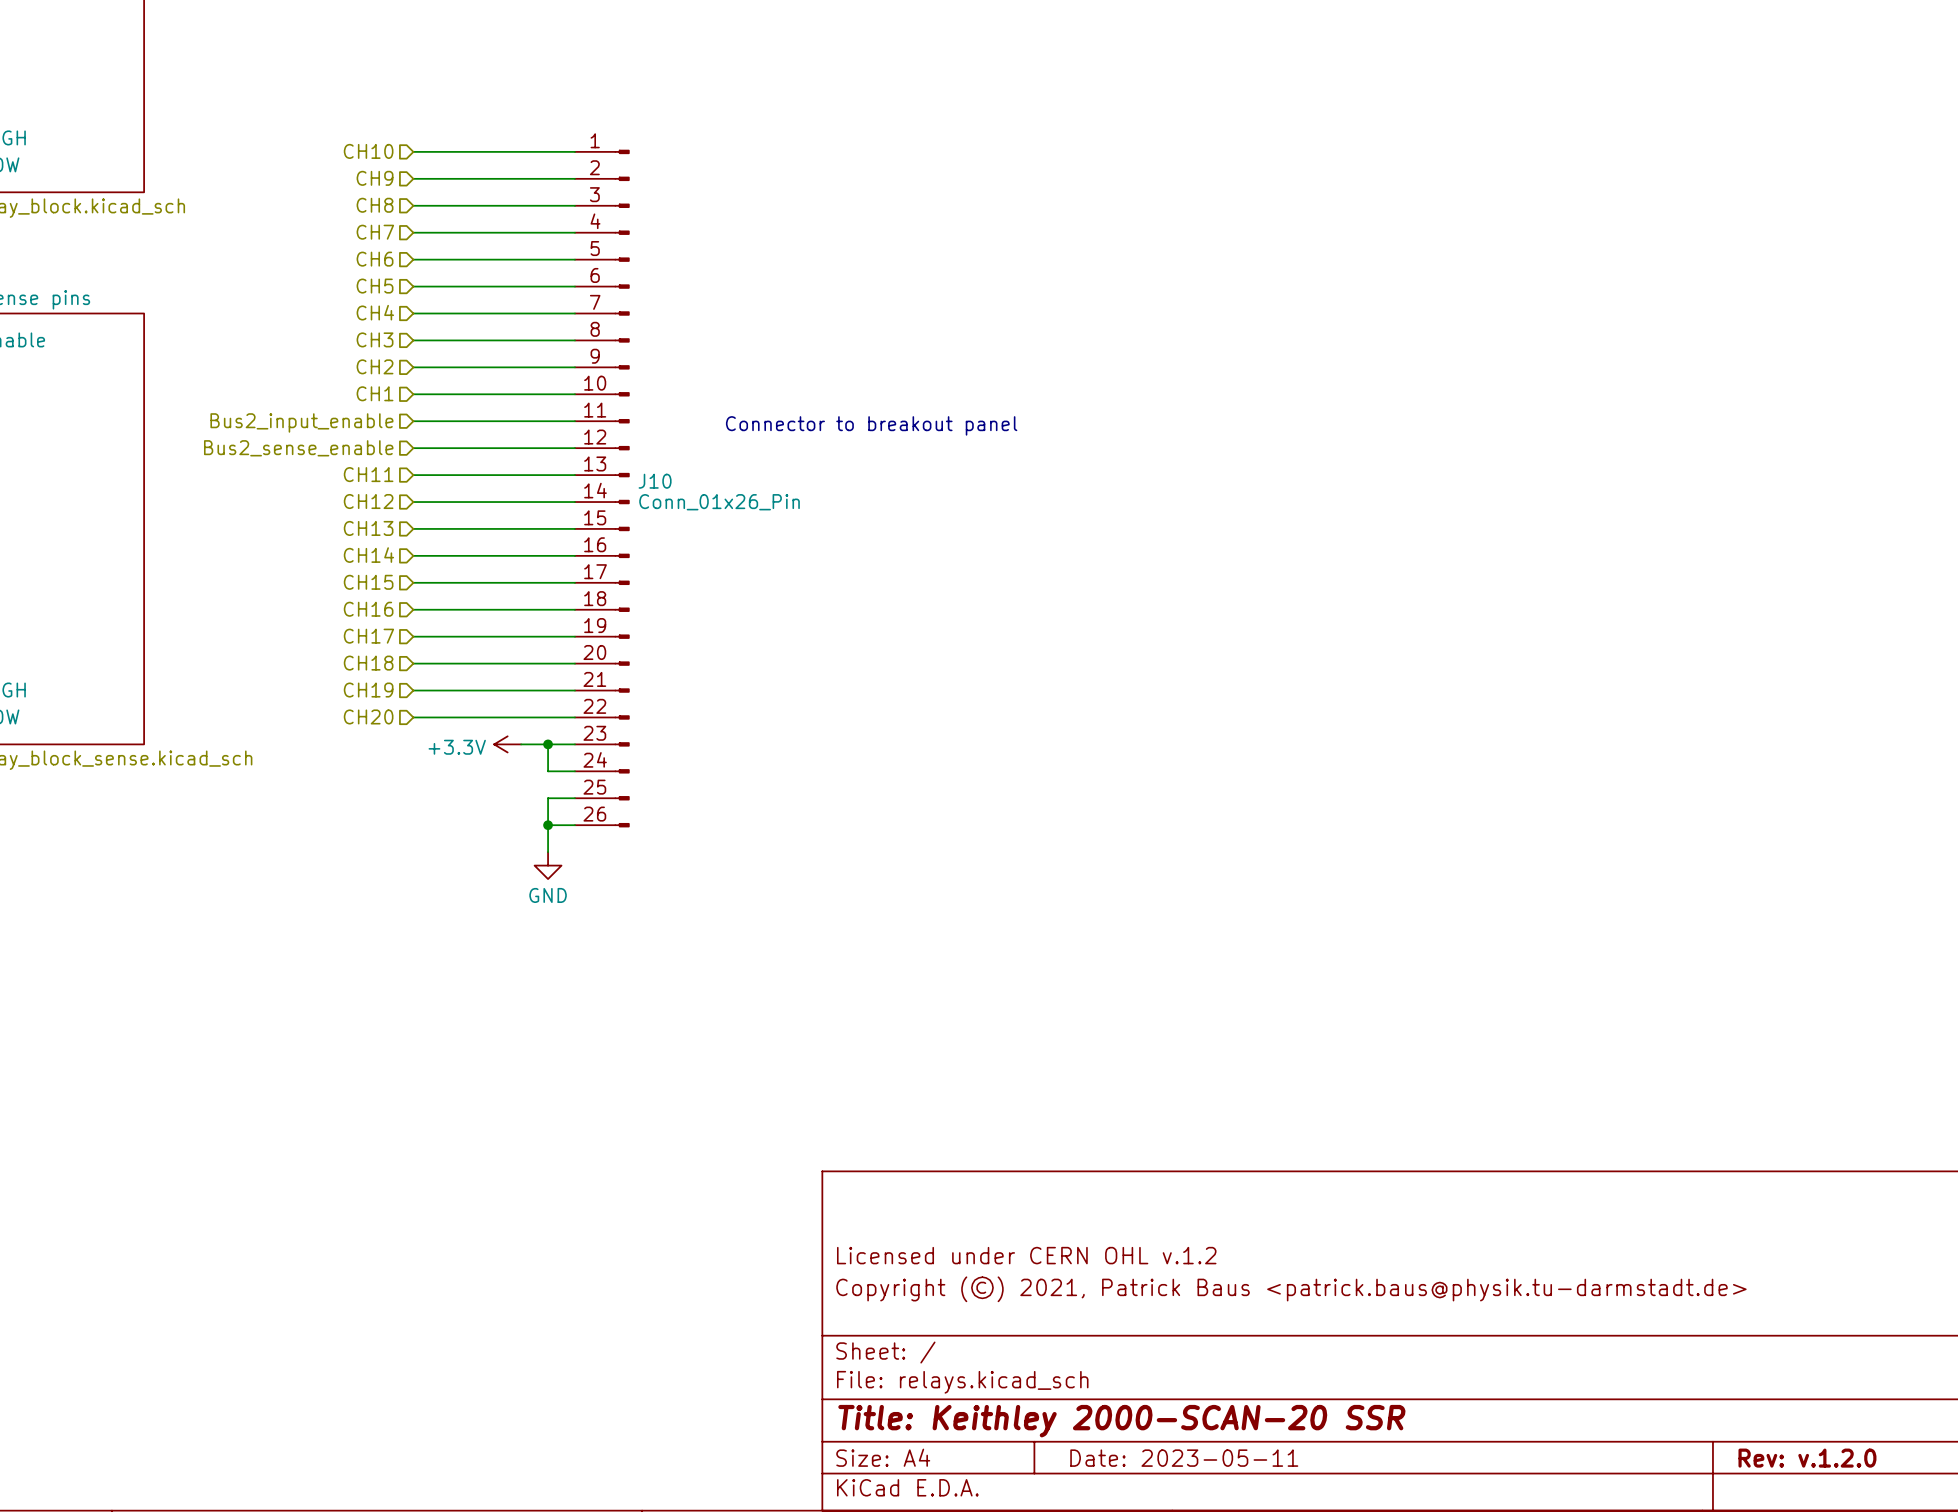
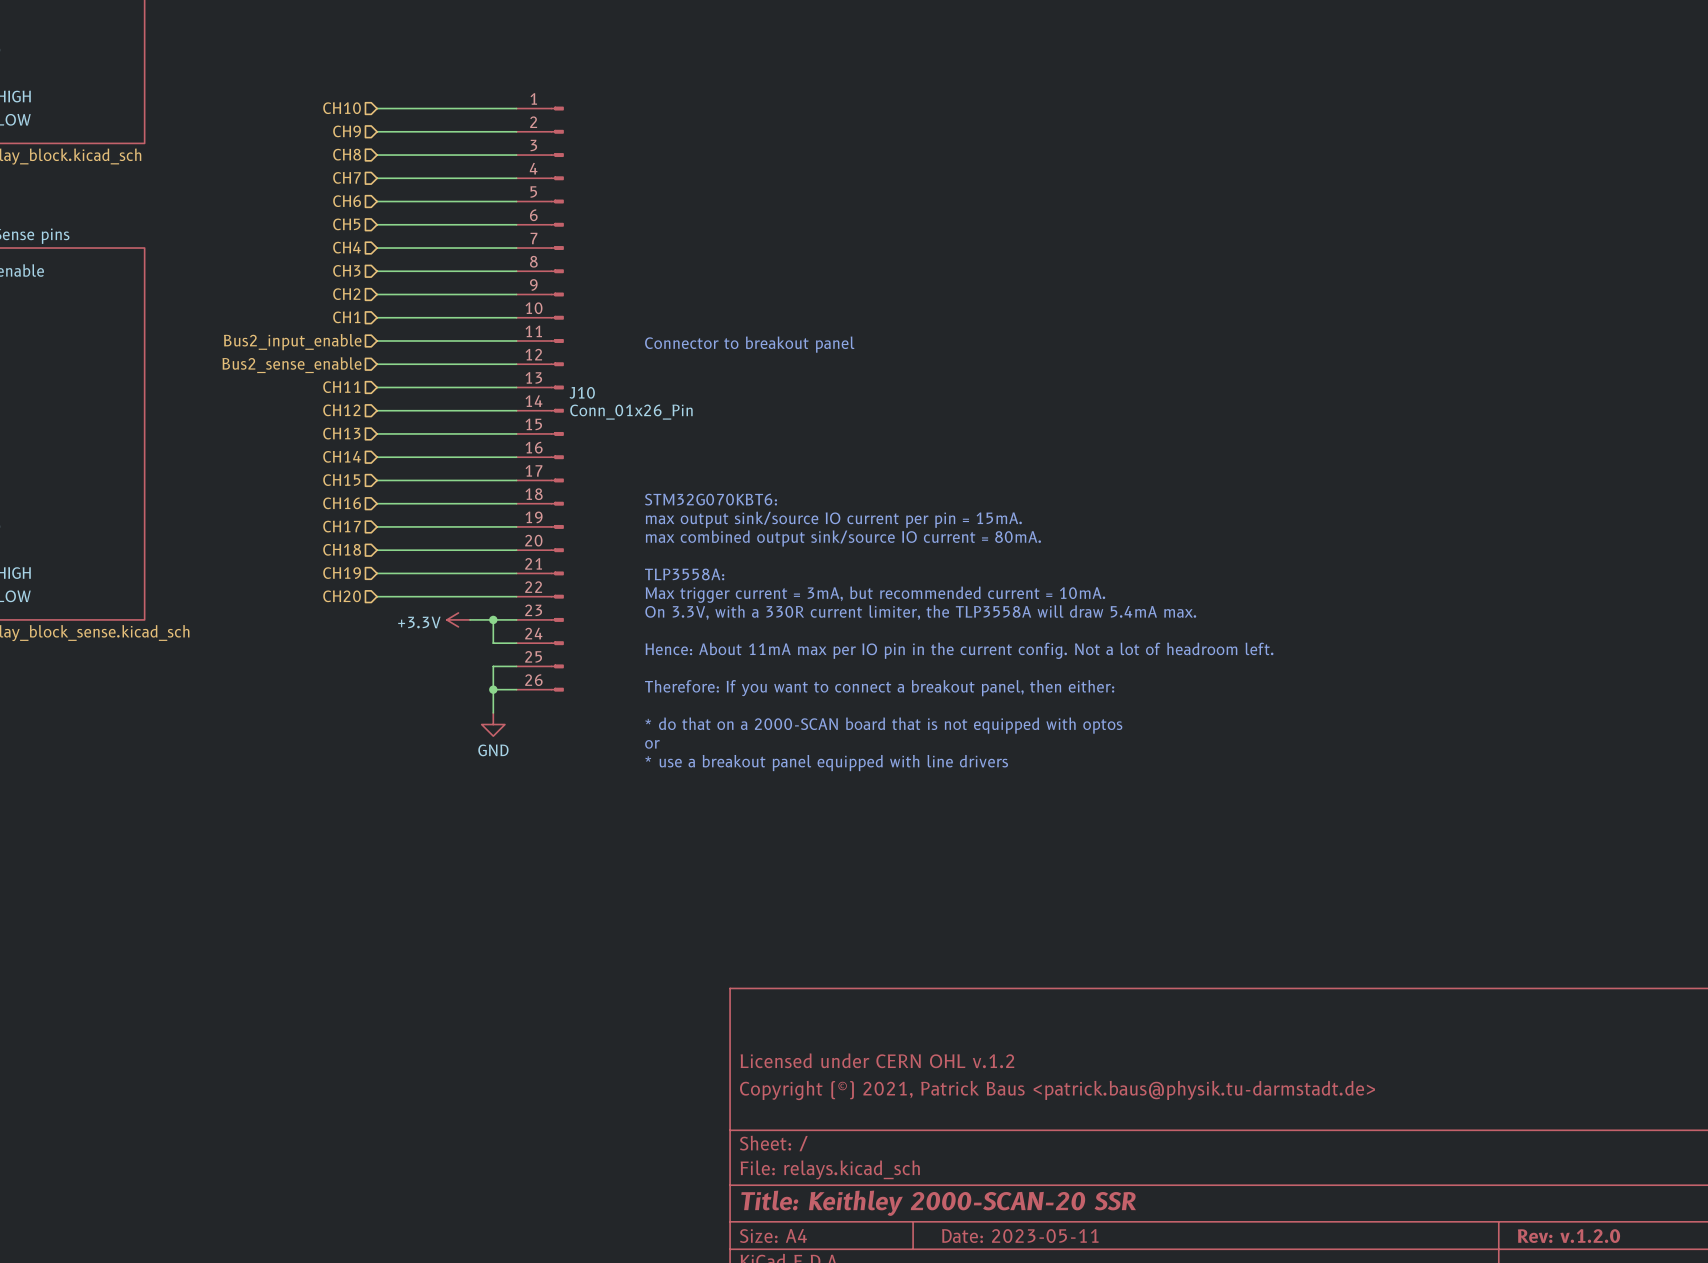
text: none -> STM32G070KBT6: (711, 499)
text: none -> max output sink/source IO current per pin = 15mA. (833, 519)
text: none -> max combined output sink/source IO current = 80mA. (843, 538)
text: none -> TLP3558A: (684, 574)
text: none -> Max trigger current = 3mA, but recommended current = 10mA. (875, 594)
text: none -> On 3.3V, with a 330R current limiter, the TLP3558A will draw 5.4mA max. (920, 612)
text: none -> Hence: About 11mA max per IO pin in the current config. Not a lot of headroom left. (959, 650)
text: none -> Therefore: If you want to connect a breakout panel, then either: (879, 688)
text: none -> * do that on a 2000-SCAN board that is not equipped with optos (883, 725)
text: none -> or (652, 744)
text: none -> * use a breakout panel equipped with line drivers (826, 763)

